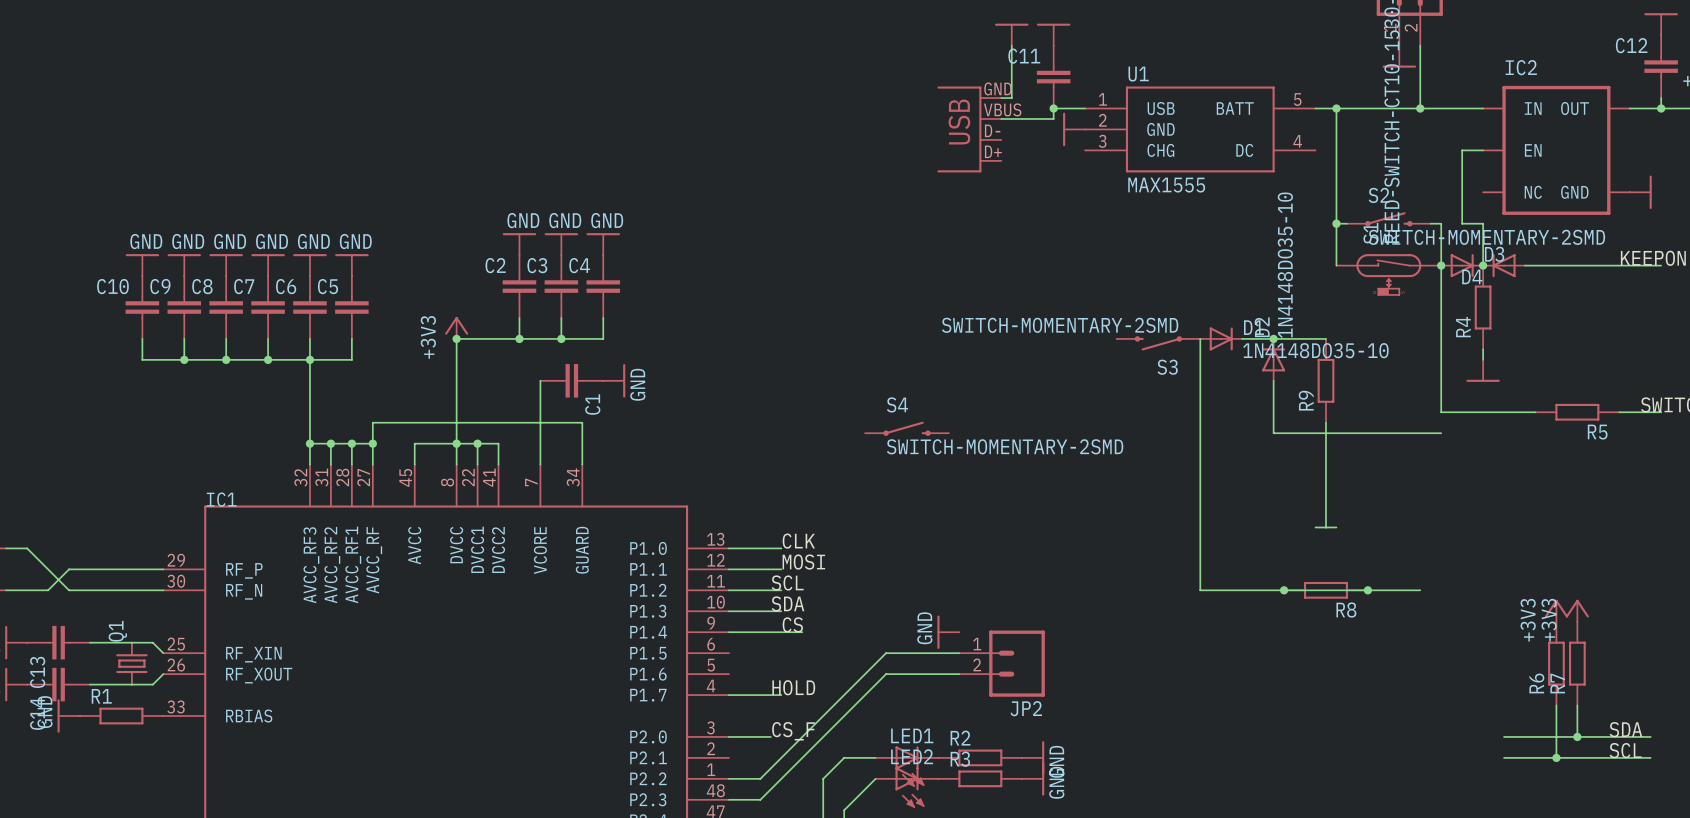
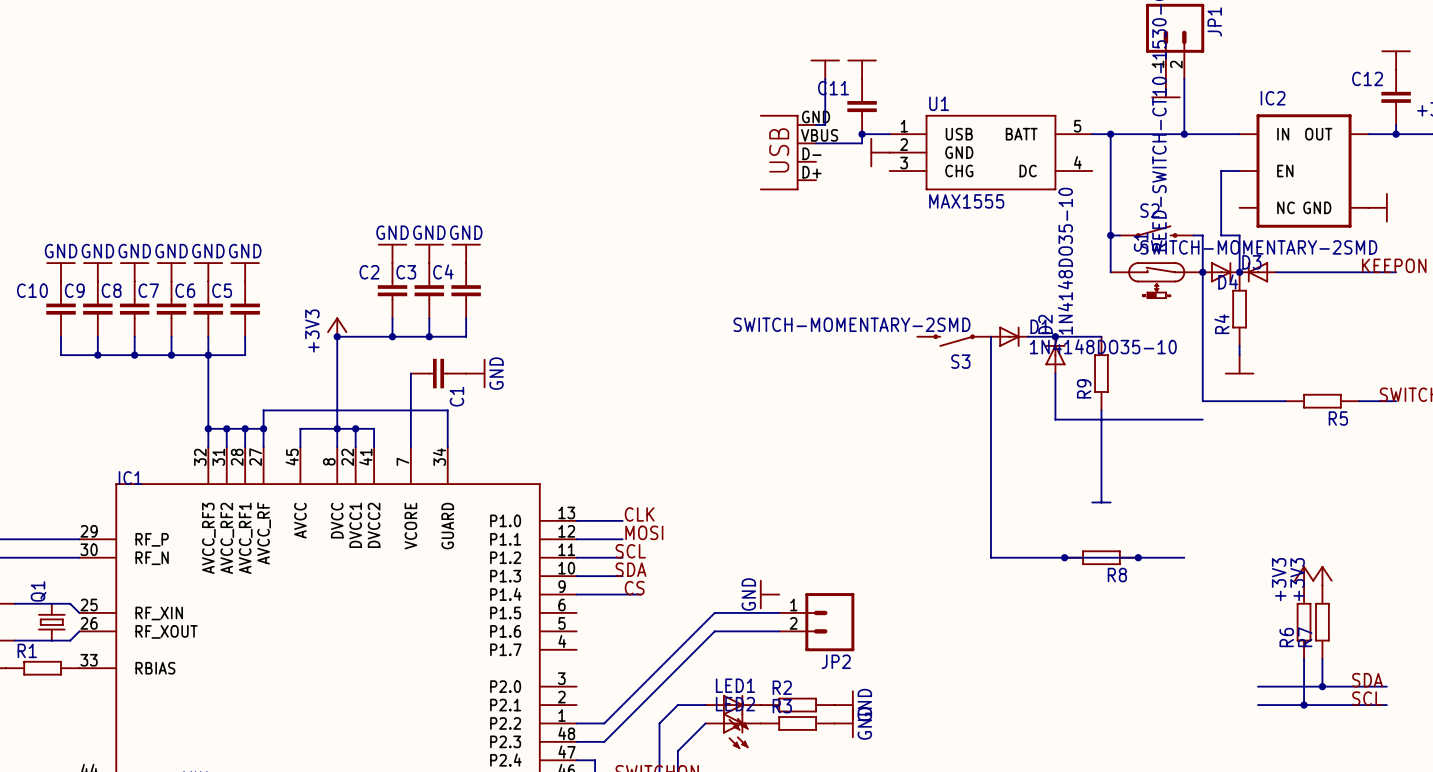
S4: SWITCH-MOMENTARY-2SMD (907, 428) -> none
label: HOLD (793, 687) -> none
wire: (728, 695) (781, 695) -> none
label: CS_F (793, 731) -> none
wire: (728, 736) (770, 736) -> none

